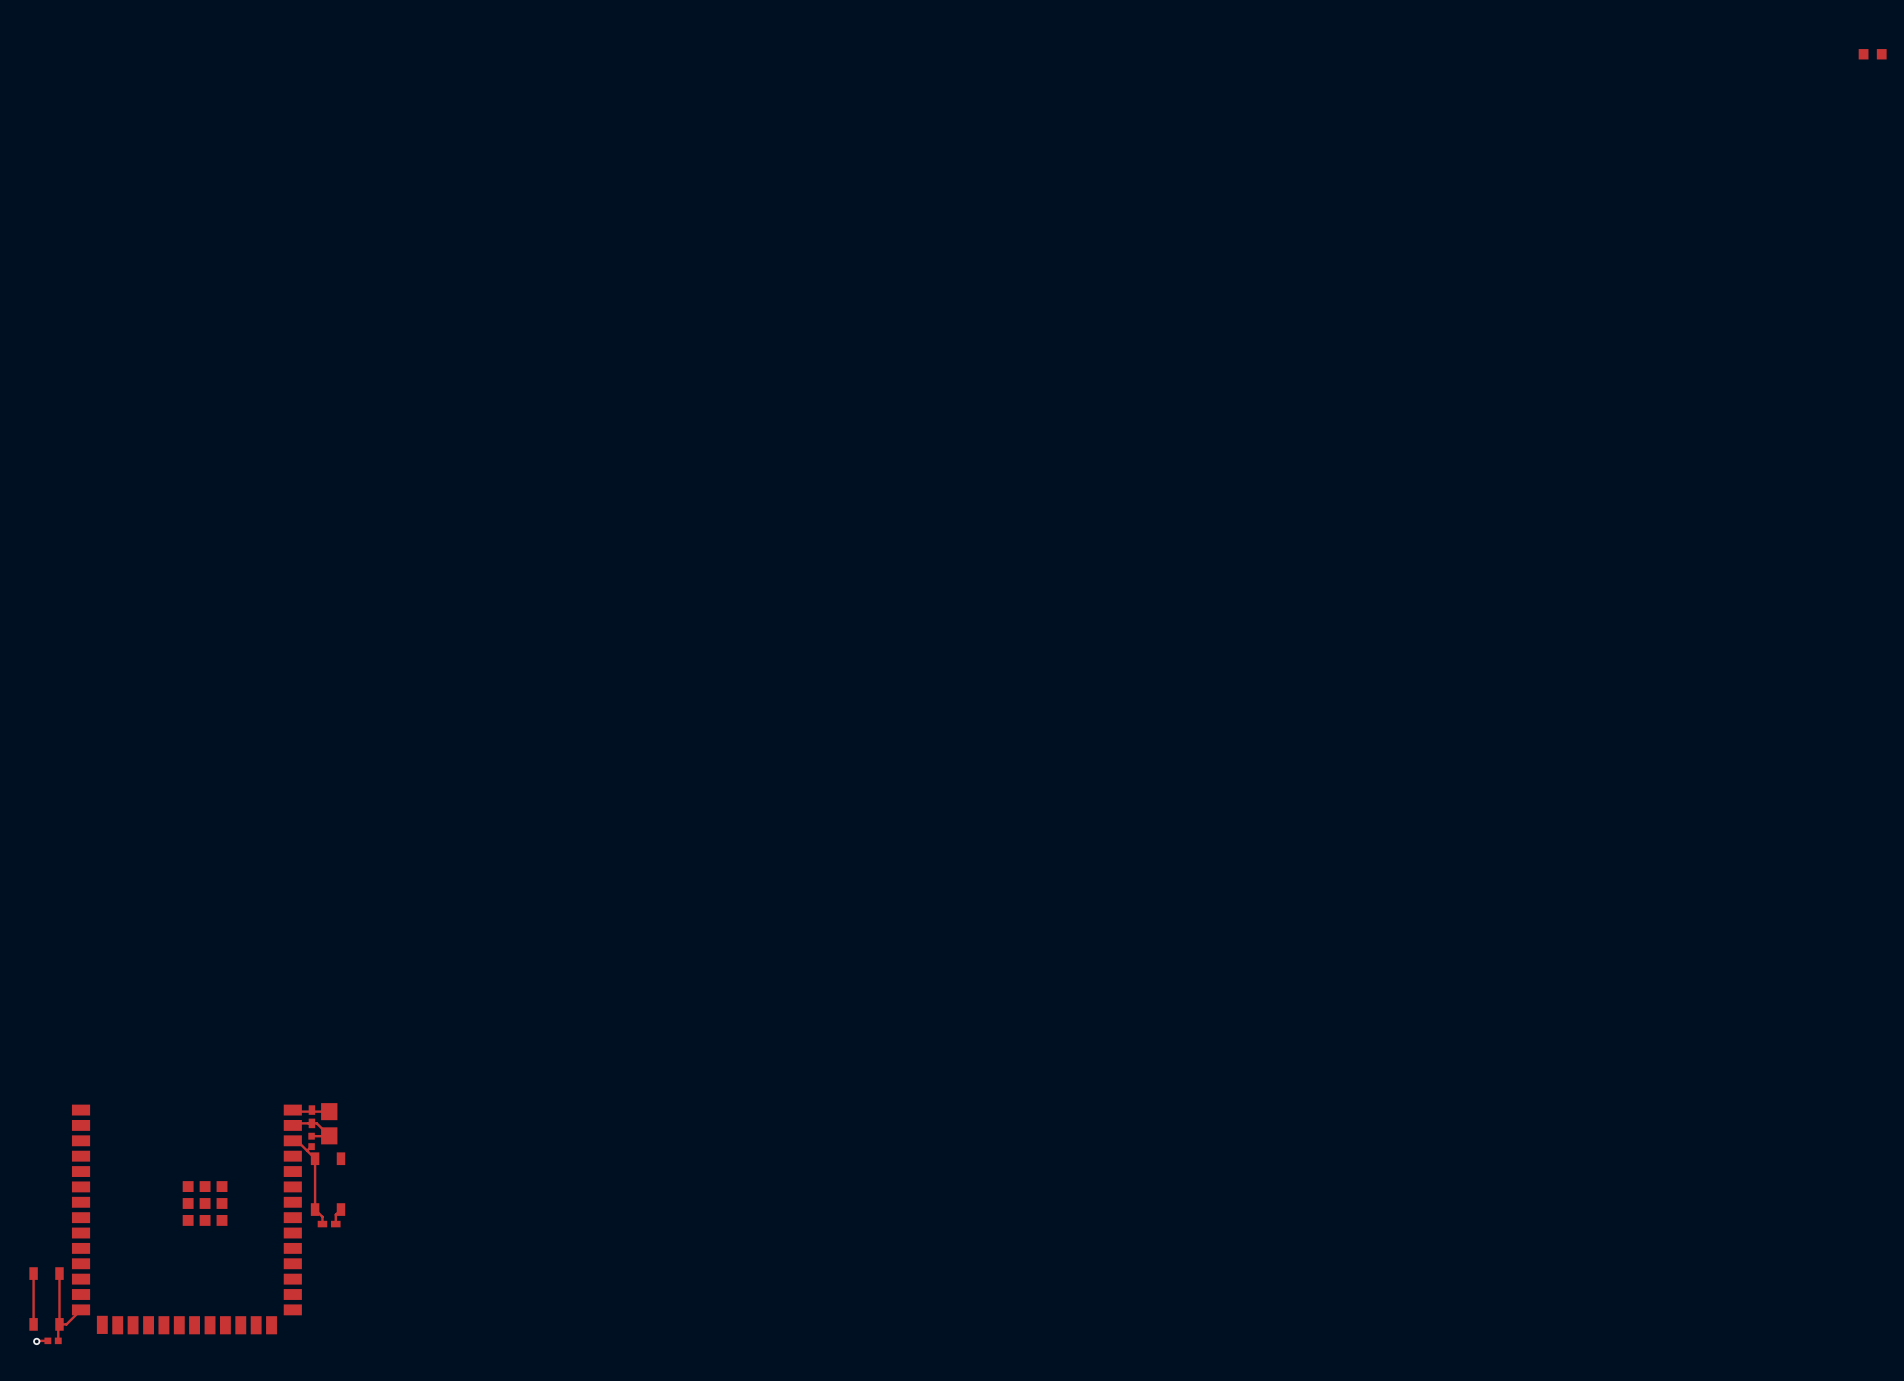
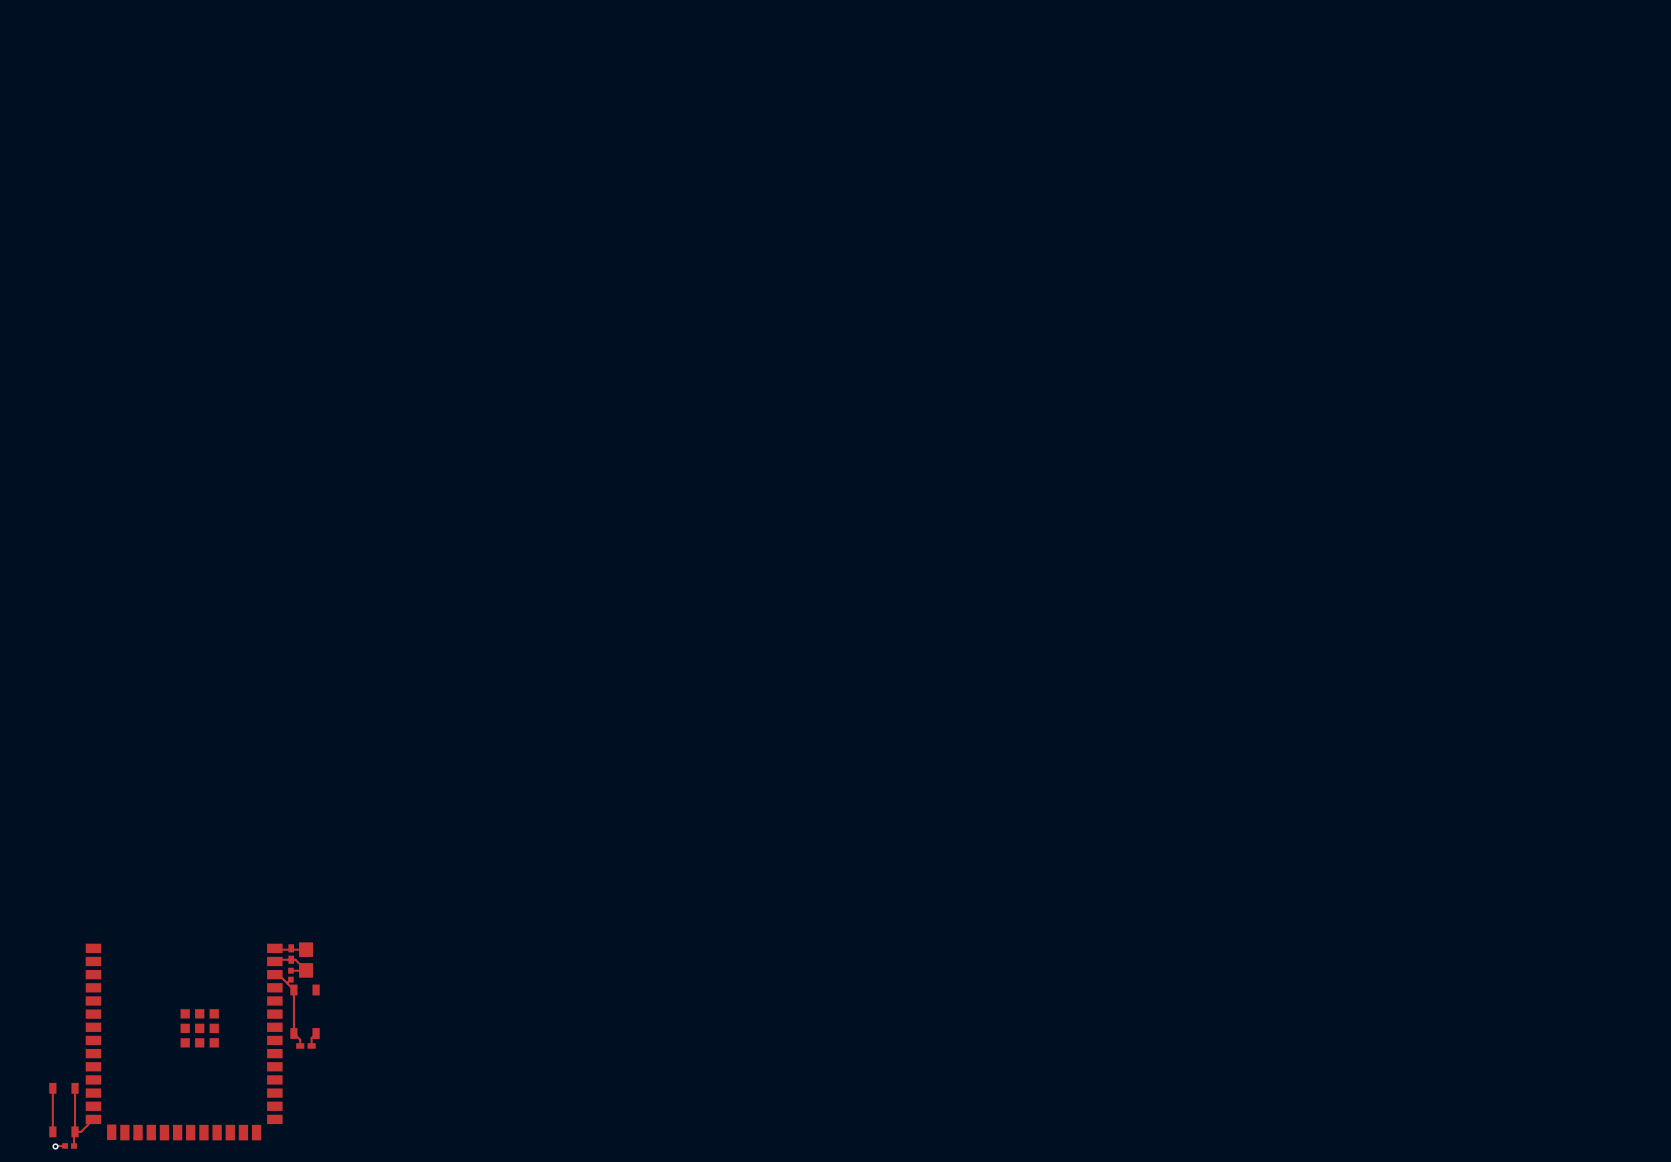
part: (1872, 54) -> none

